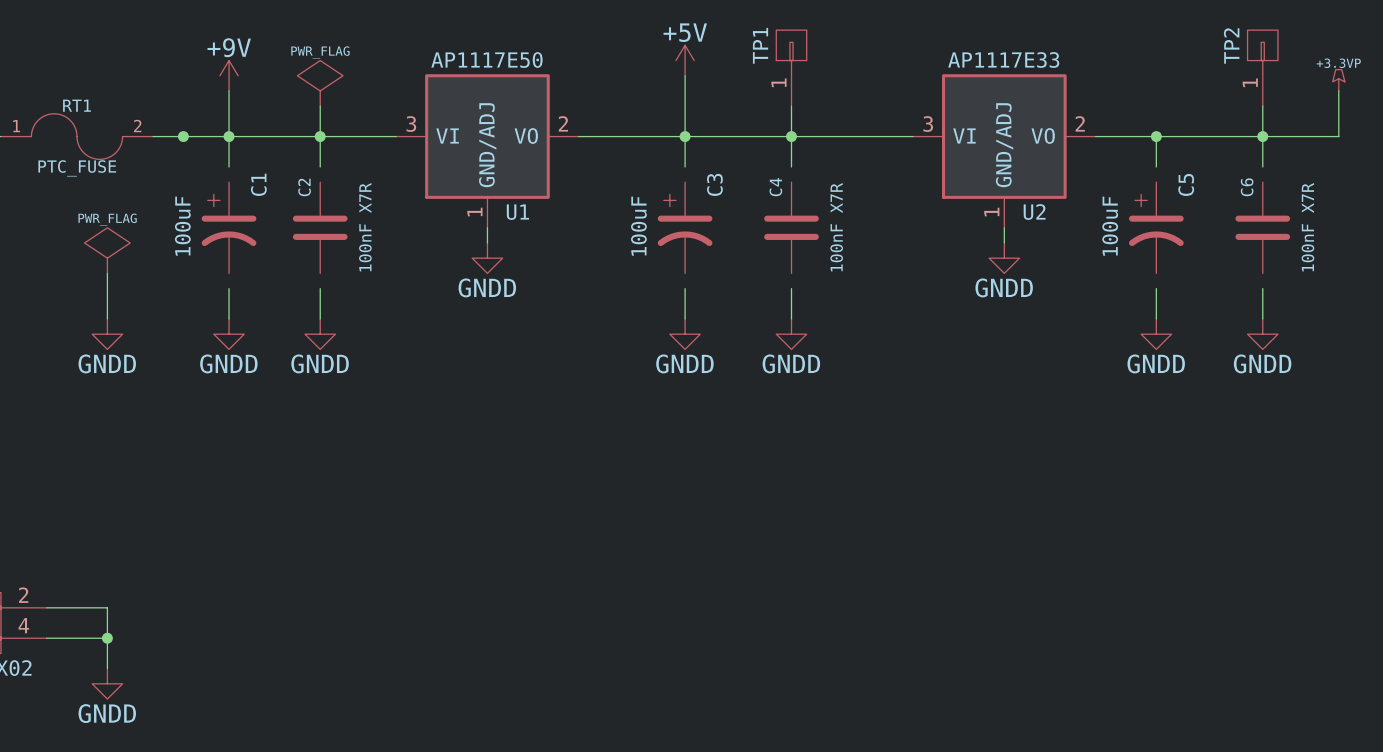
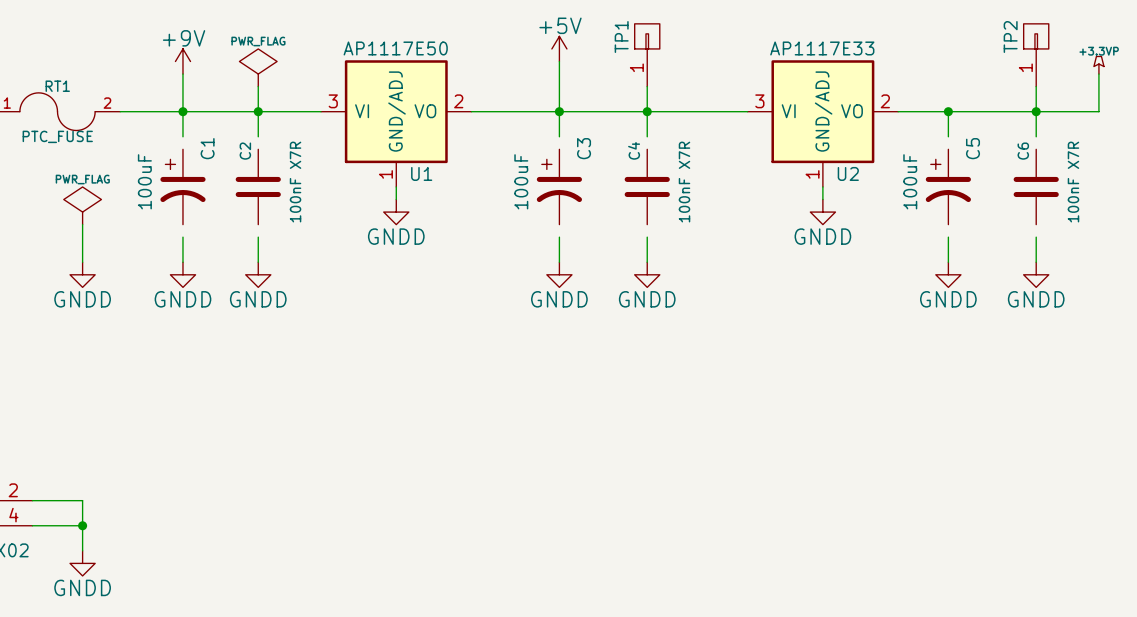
junction: (183, 136) -> none

